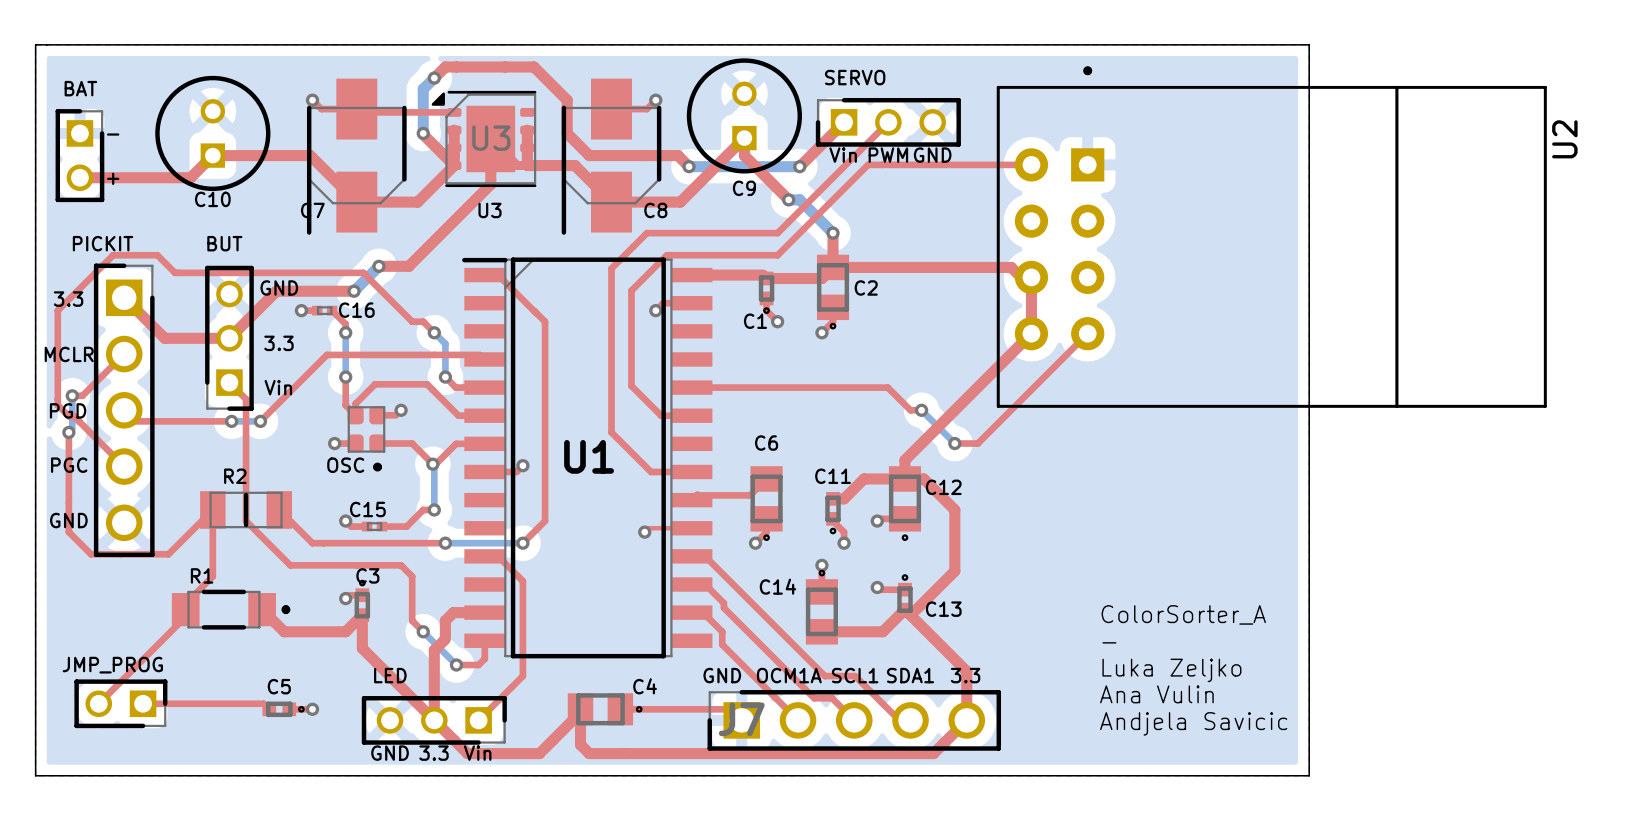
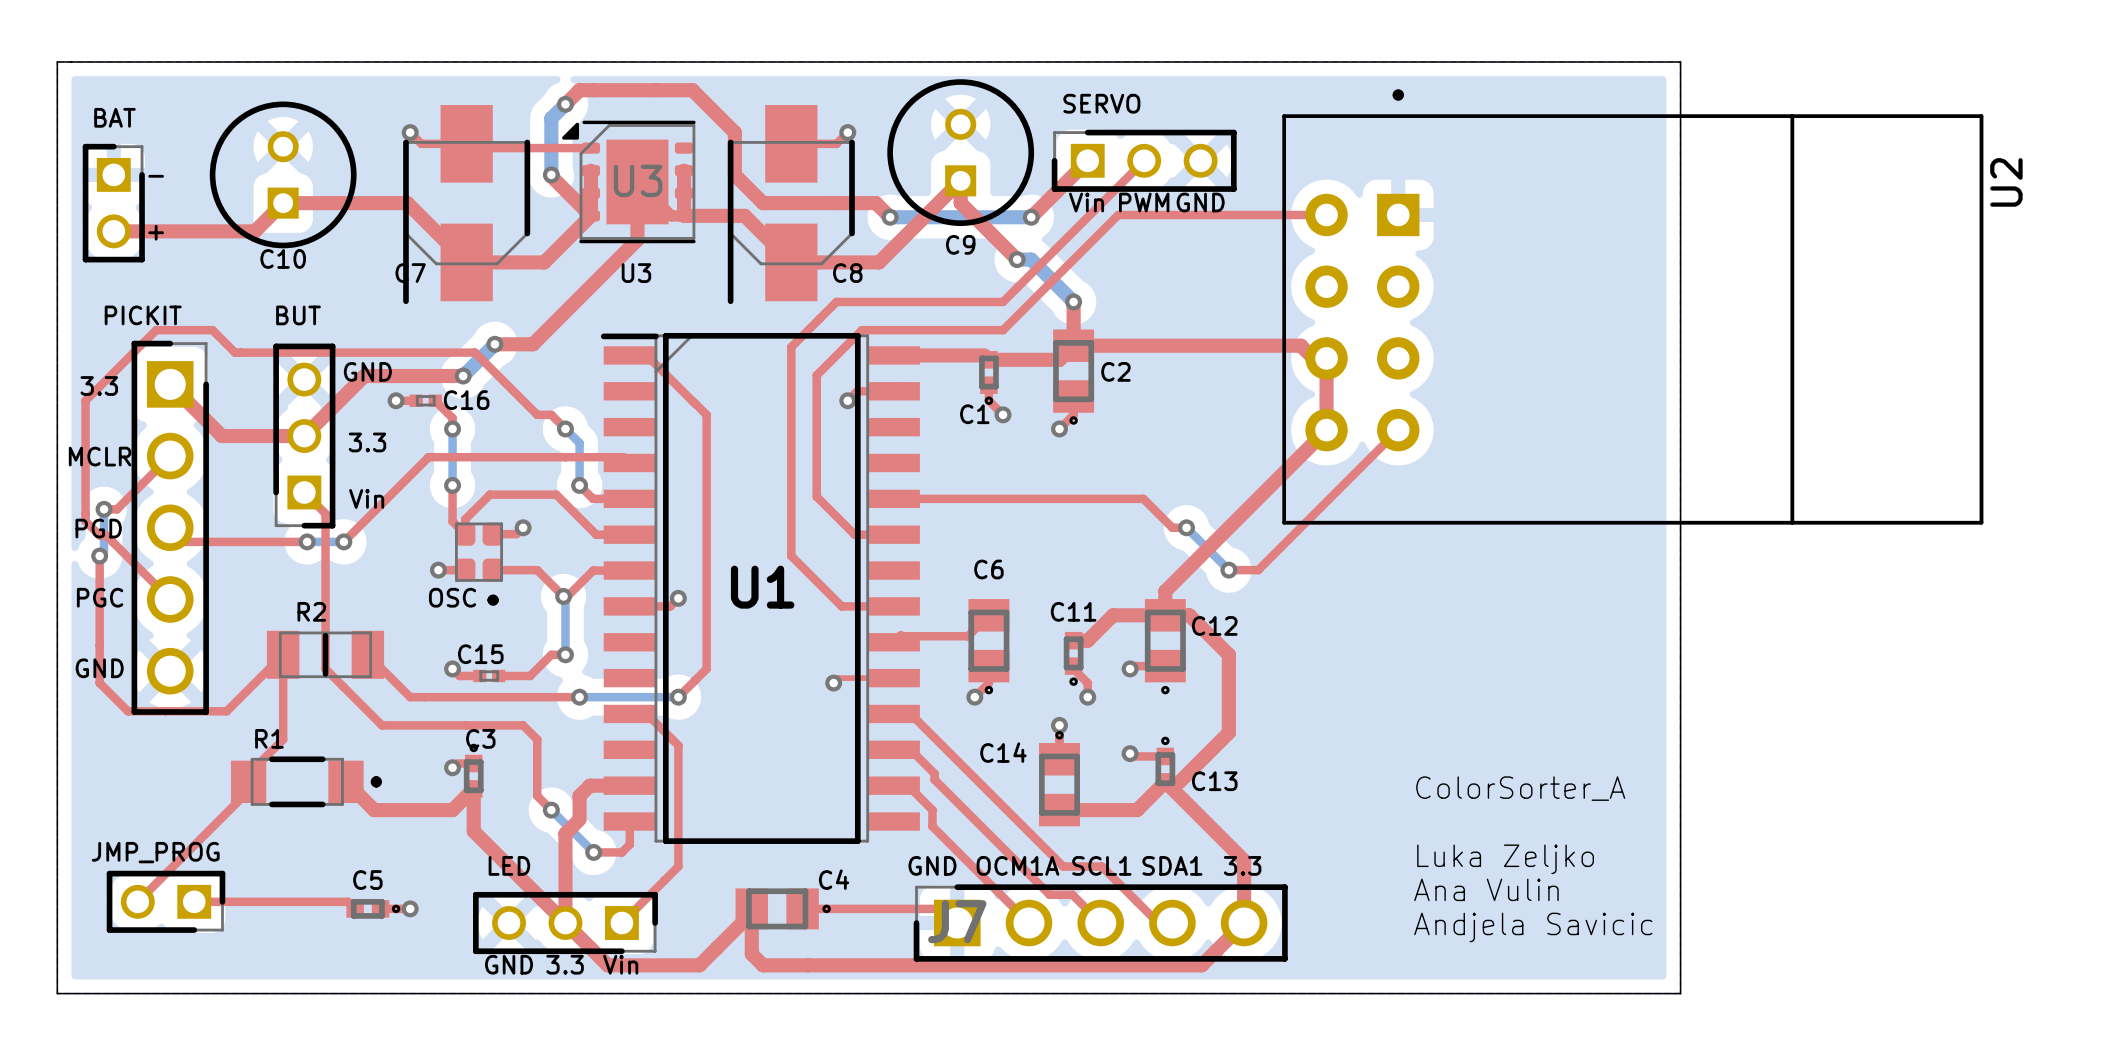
text: - (1109, 642) -> none

